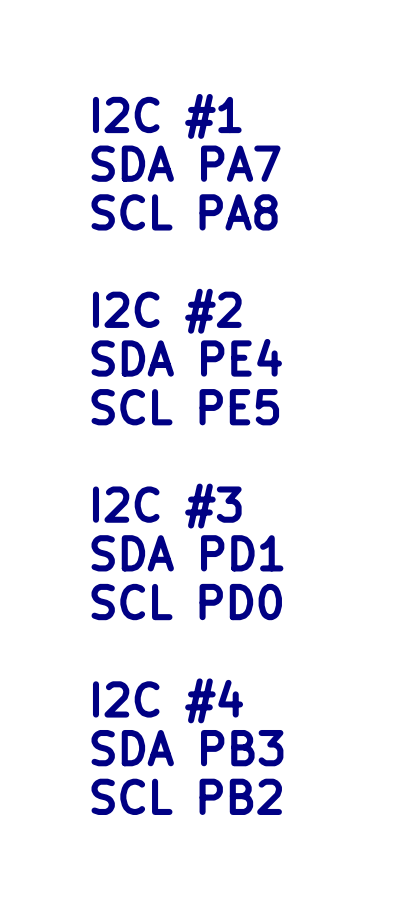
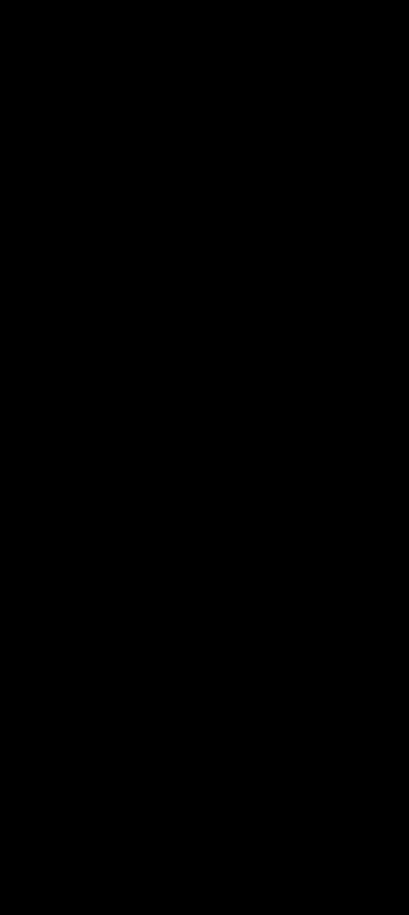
text: I2C #1 (167, 116) -> none
text: SDA PA7 (186, 163) -> none
text: SCL PA8 (184, 212) -> none
text: I2C #2 (167, 311) -> none
text: SDA PE4 (186, 357) -> none
text: SCL PE5 (185, 407) -> none
text: I2C #3 (167, 506) -> none
text: SDA PD1 (187, 553) -> none
text: SCL PD0 (186, 602) -> none
text: I2C #4 (168, 700) -> none
text: SDA PB3 (187, 748) -> none
text: SCL PB2 (186, 796) -> none

